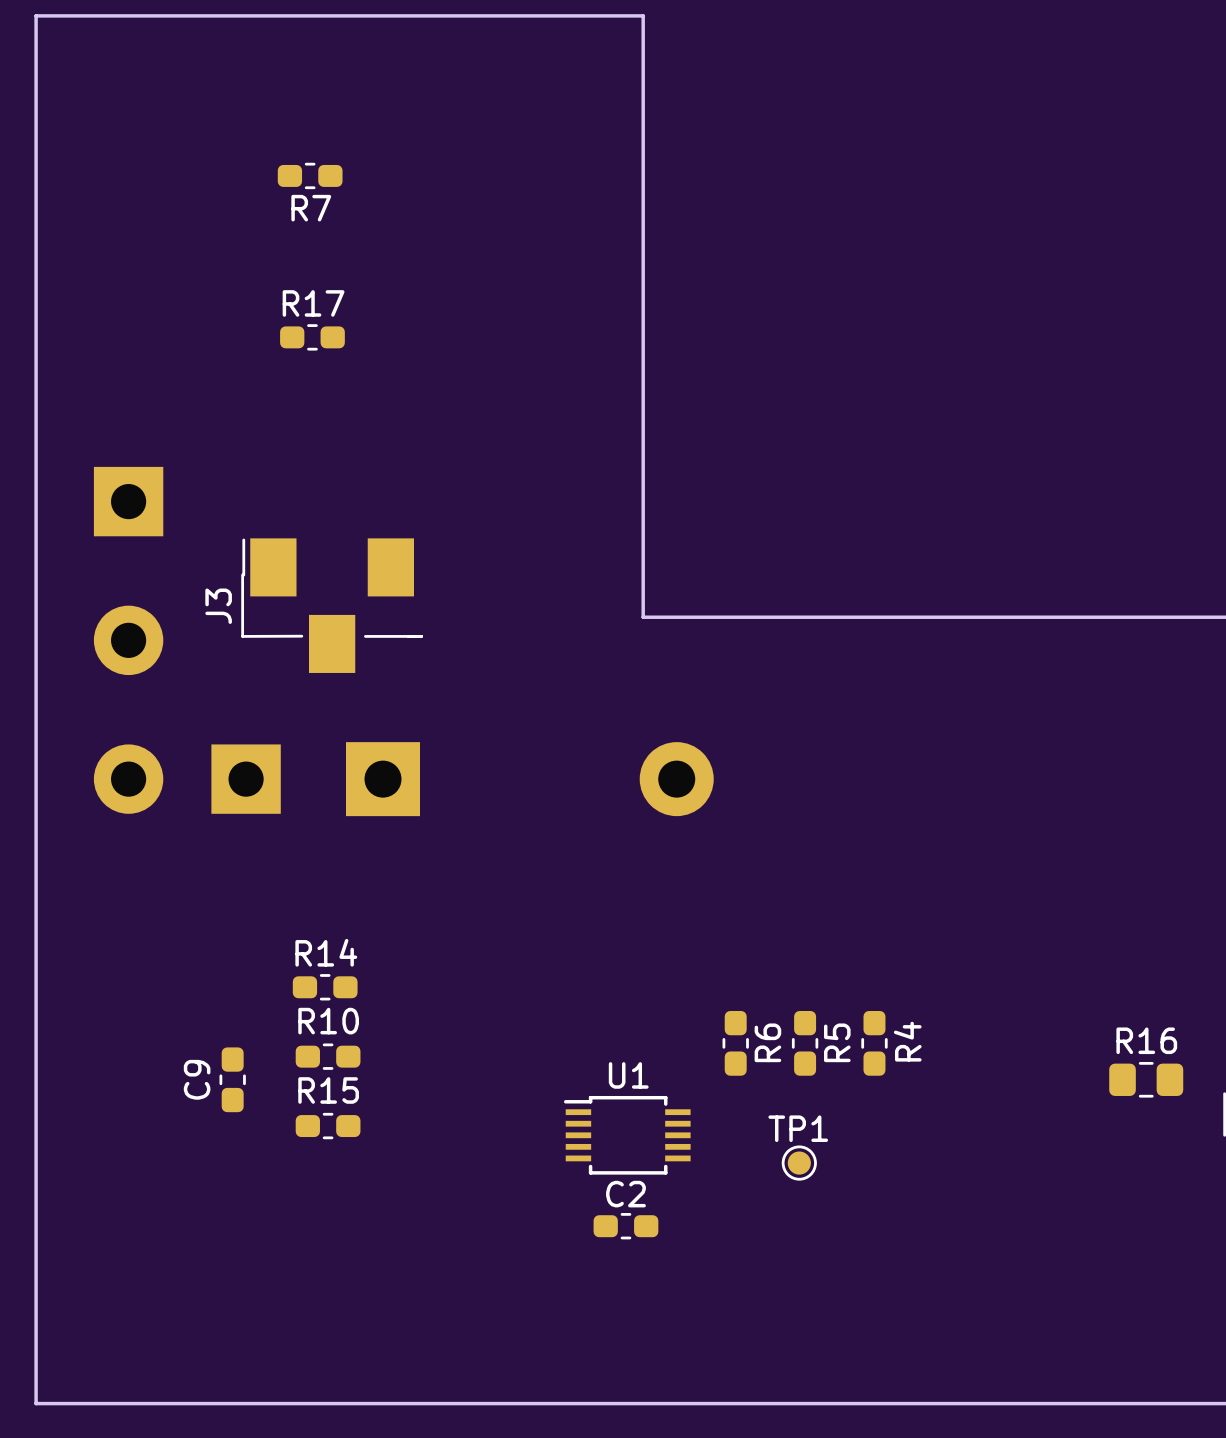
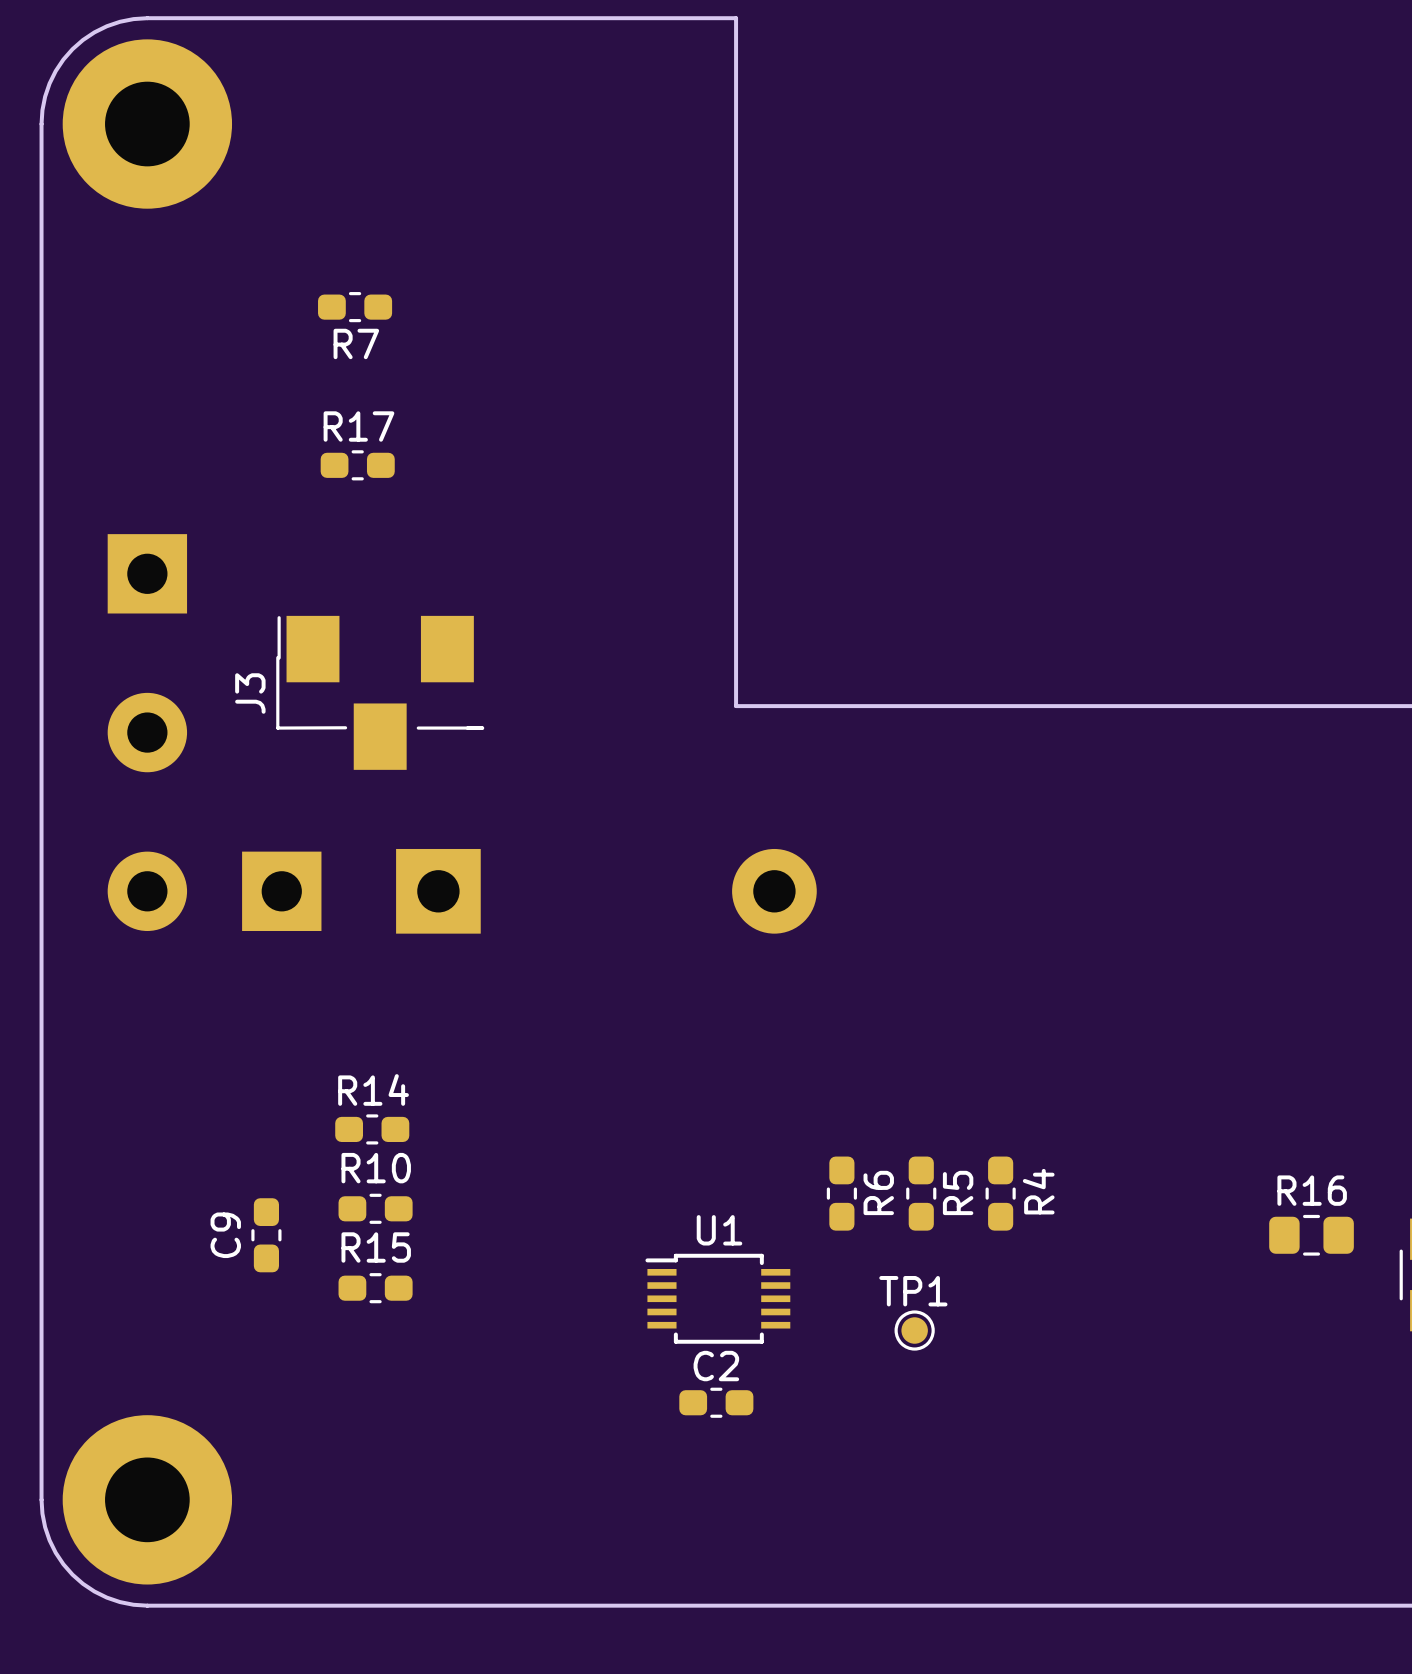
board edge: (128, 15) (36, 15) (36, 108) -> (147, 18) (119, 21) (106, 26) (82, 40) (72, 49) (63, 59) (49, 83) (45, 96) (41, 124)
part: none -> (147, 124)
R7 position: (310, 175) -> (355, 307)
R17 position: (312, 337) -> (357, 465)
board edge: (36, 1311) (36, 1403) (128, 1403) -> (41, 1499) (45, 1527) (49, 1540) (63, 1564) (72, 1574) (94, 1591) (106, 1597) (119, 1602) (147, 1605)
part: none -> (147, 1499)

